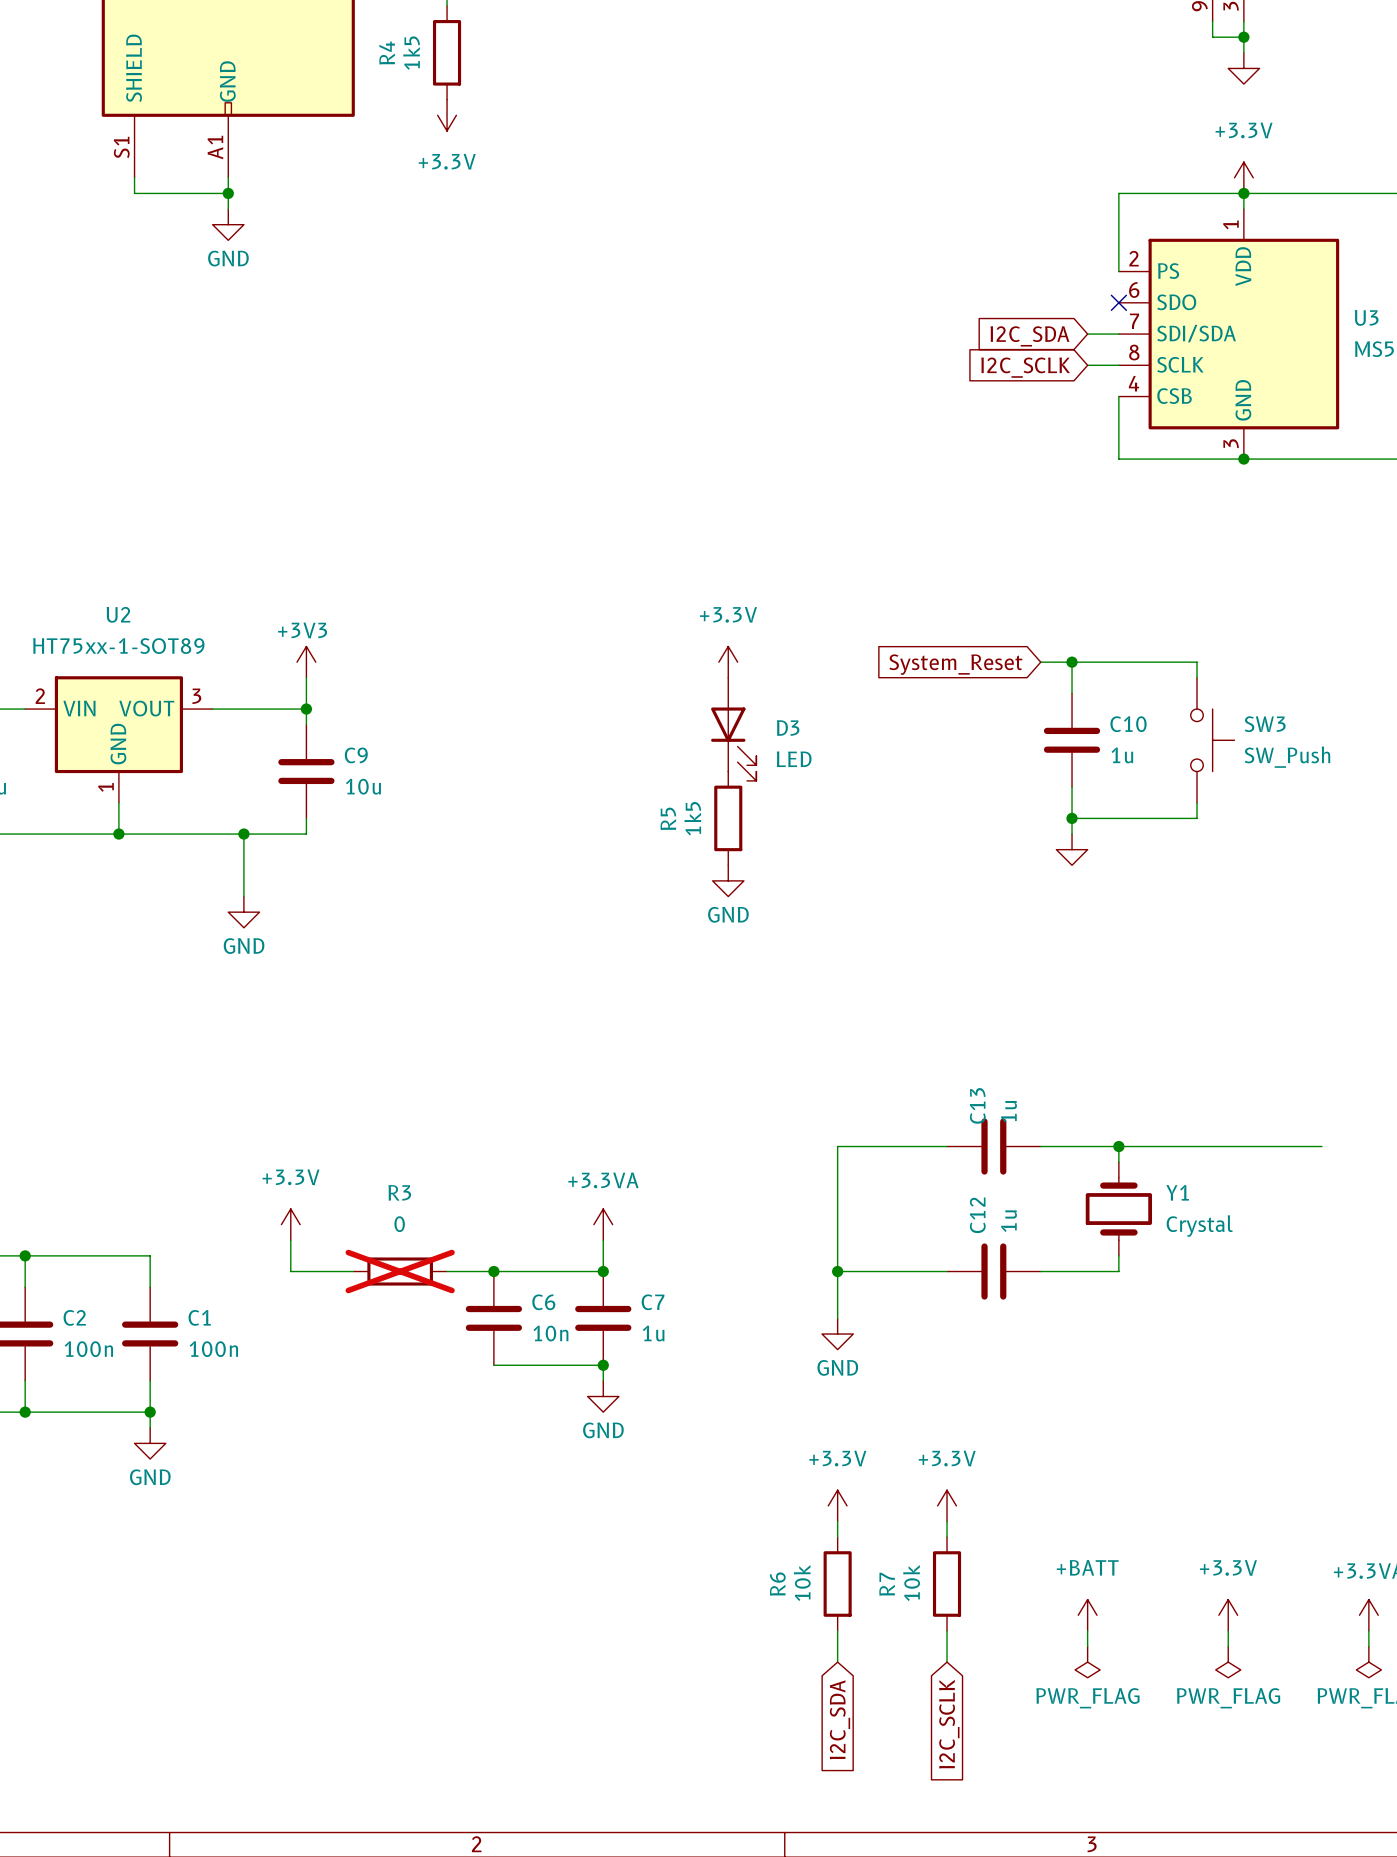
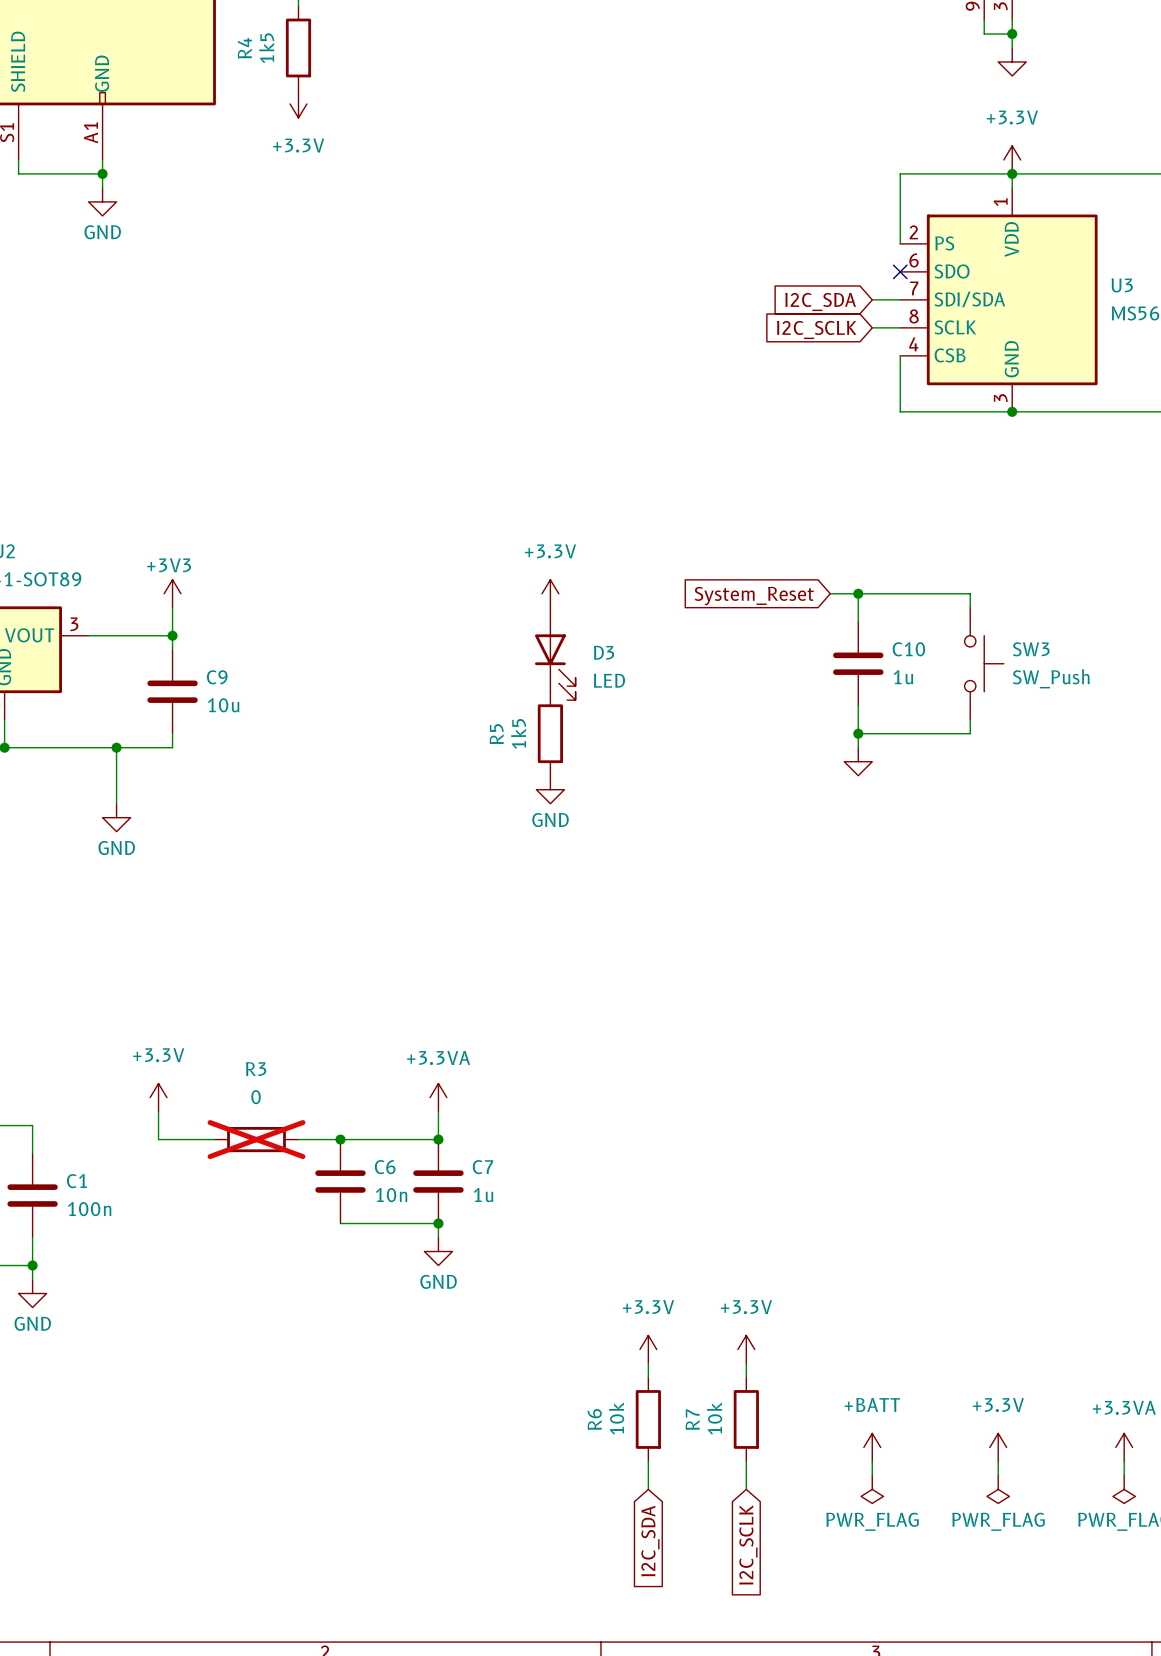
wire: (947, 1146) (837, 1146) (837, 1318) -> none
C13: 1u (993, 1146) -> none
wire: (1040, 1146) (1322, 1146) -> none
wire: (1118, 1146) (1118, 1162) -> none
junction: (1118, 1146) -> none
Y1: Crystal (1118, 1209) -> none
wire: (1118, 1255) (1118, 1271) (1040, 1271) -> none
wire: (837, 1271) (947, 1271) -> none
junction: (837, 1271) -> none
C12: 1u (993, 1271) -> none
power symbol: GND (837, 1334) -> none

